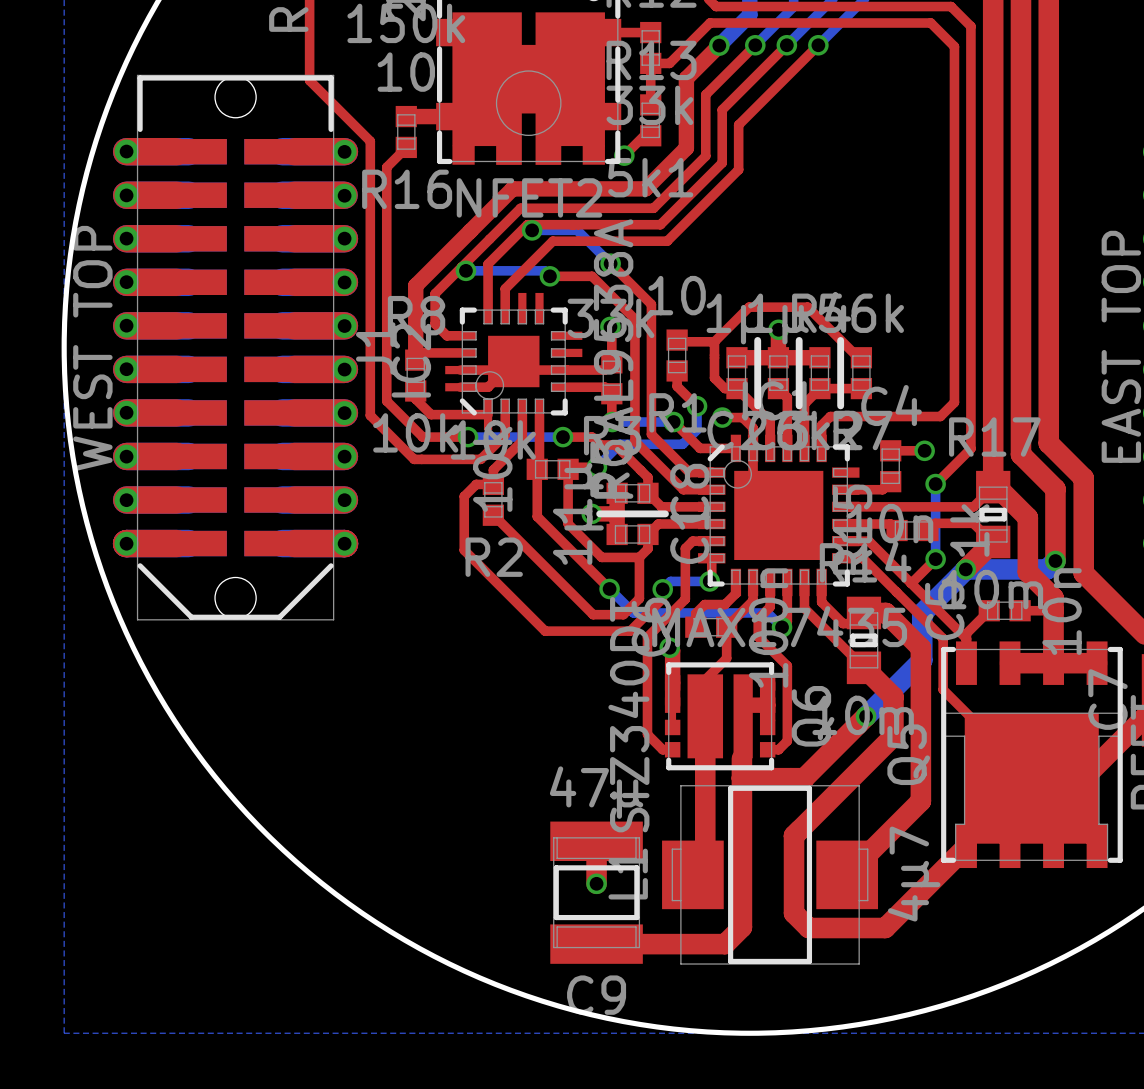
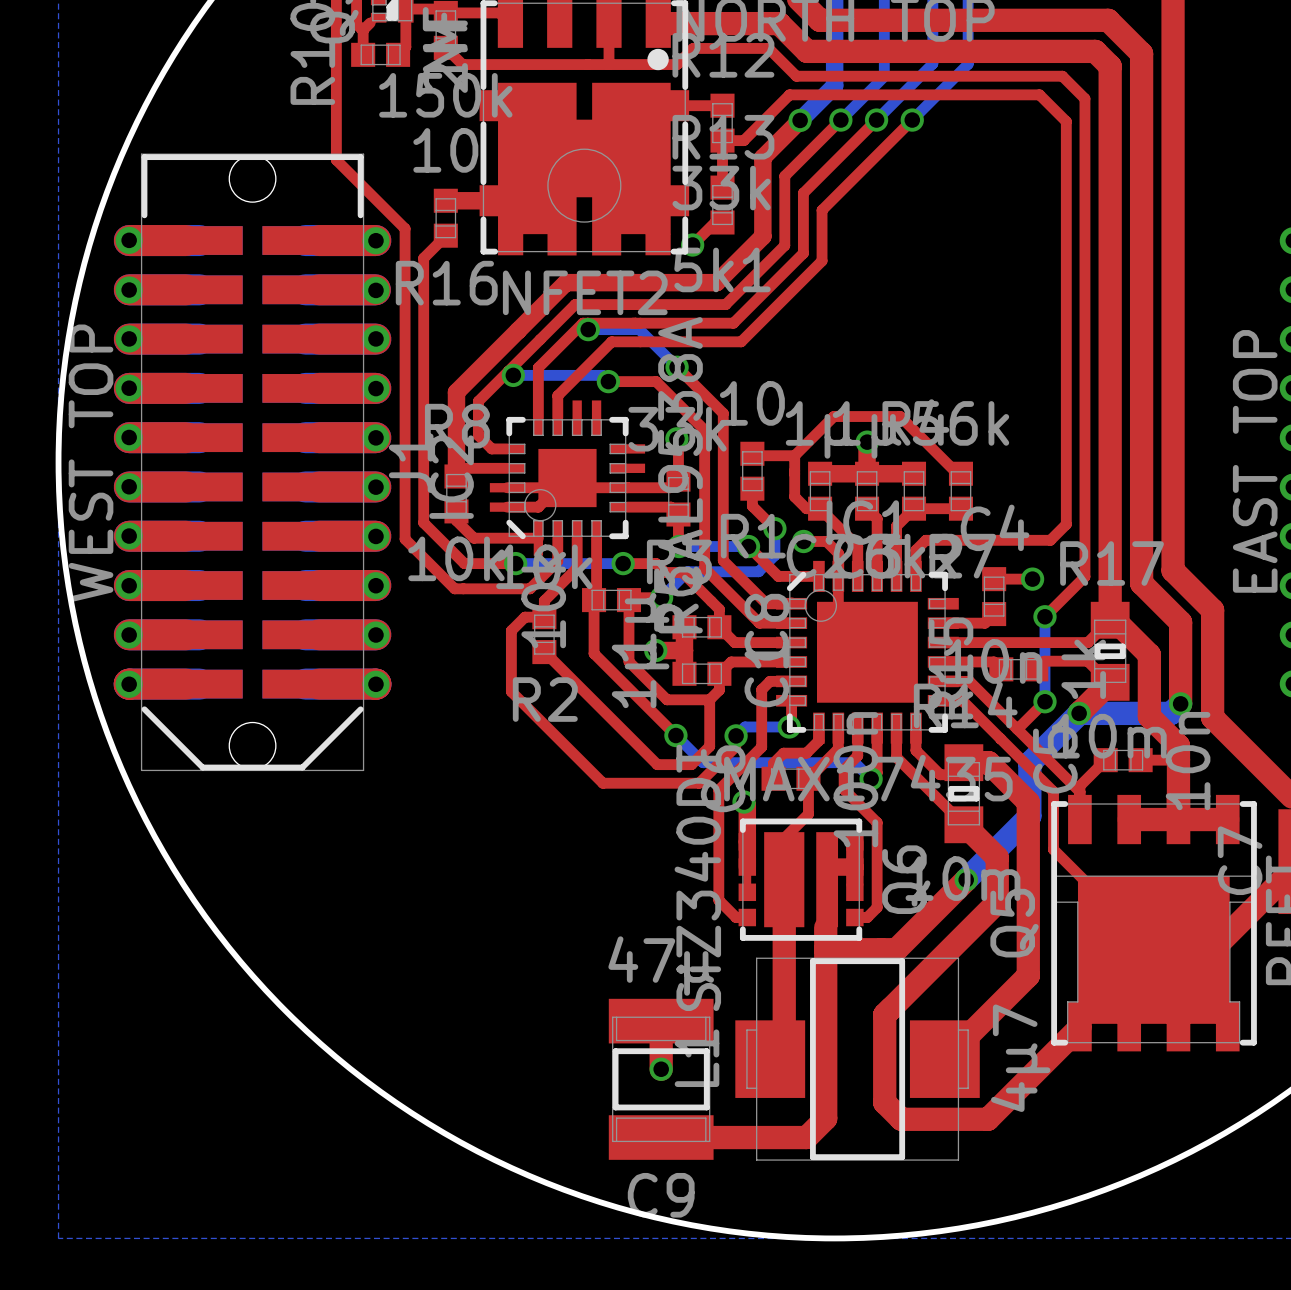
line: (757, 340) (757, 405) -> none
line: (799, 340) (799, 405) -> none
line: (840, 340) (840, 405) -> none
line: (599, 513) (665, 513) -> none

